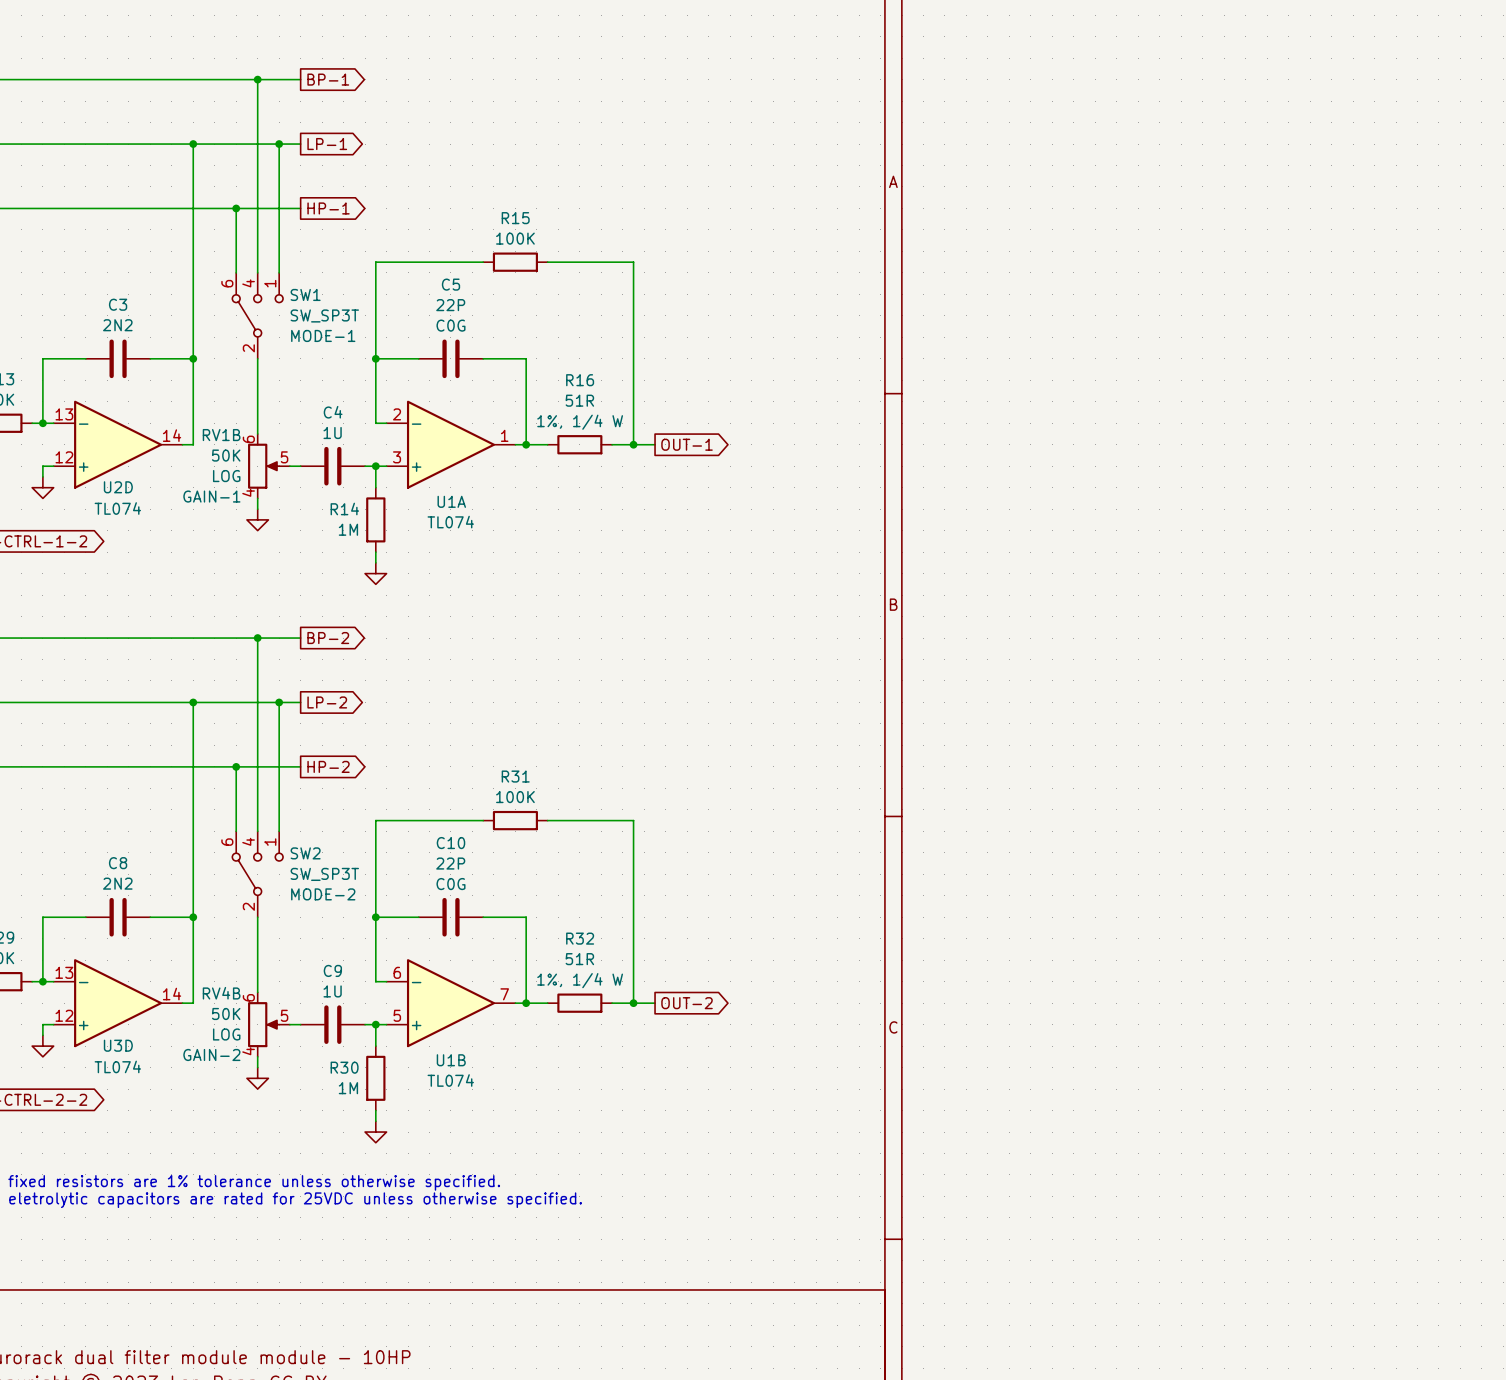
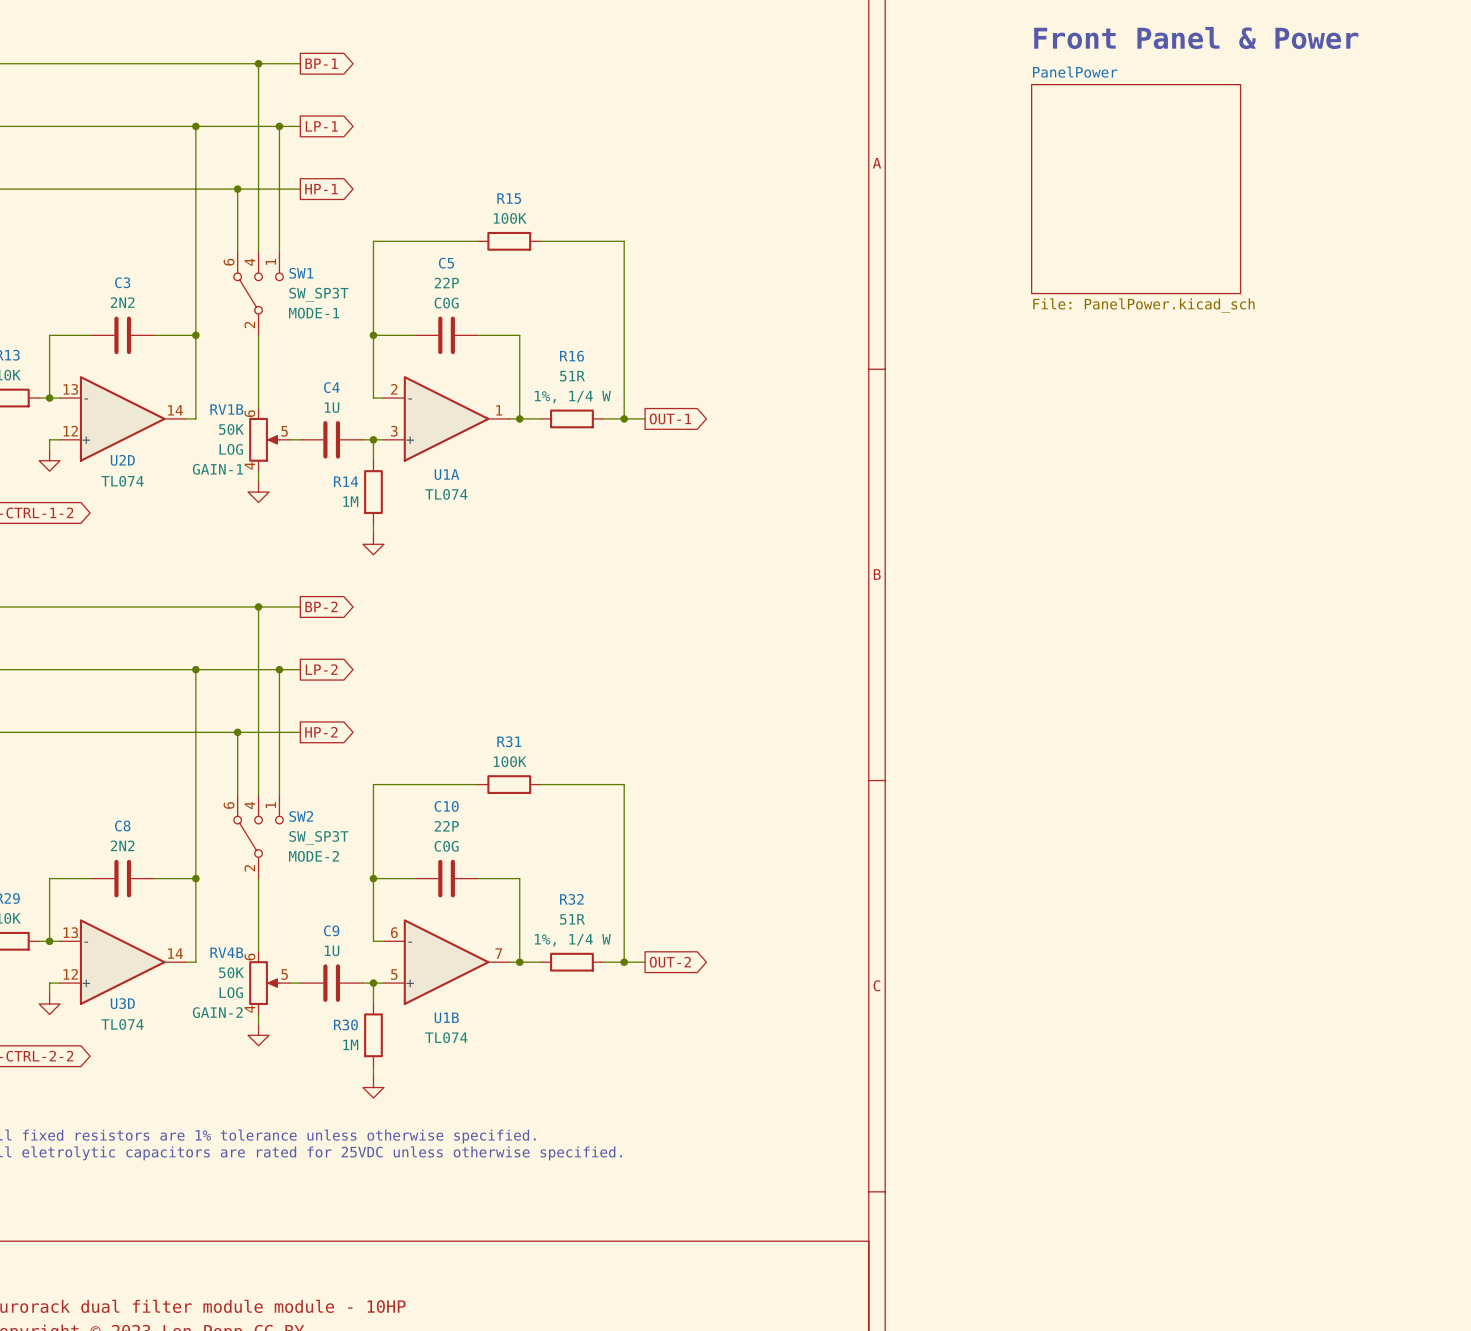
text: none -> Front Panel & Power (1196, 37)
sheet PanelPower: none -> File: PanelPower.kicad_sch (1136, 189)

